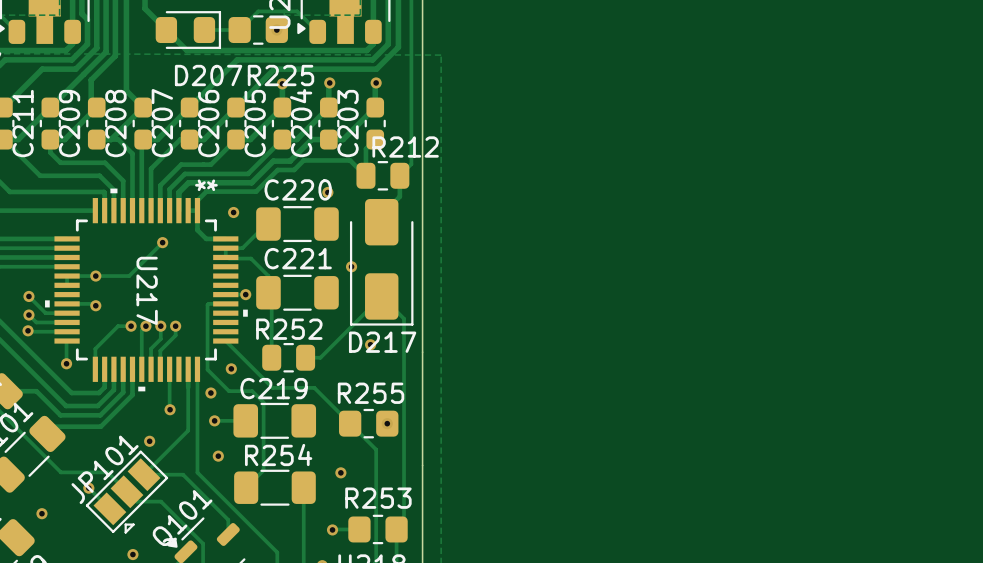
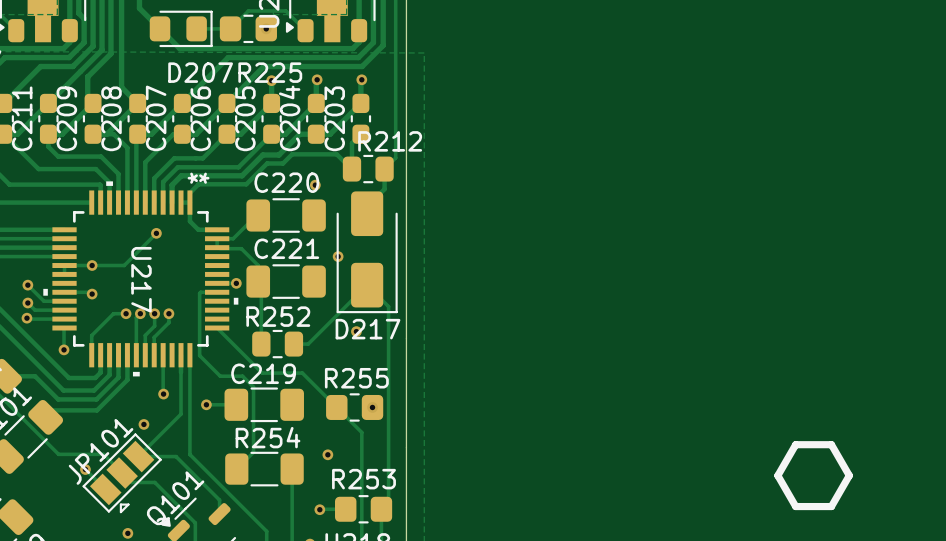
via: (233, 212) -> none
via: (231, 368) -> none
via: (210, 393) -> none
via: (218, 456) -> none
line: none -> (795, 444) (777, 475) (795, 506) (831, 506) (849, 475) (831, 444) (795, 444)
via: (41, 513) -> none

